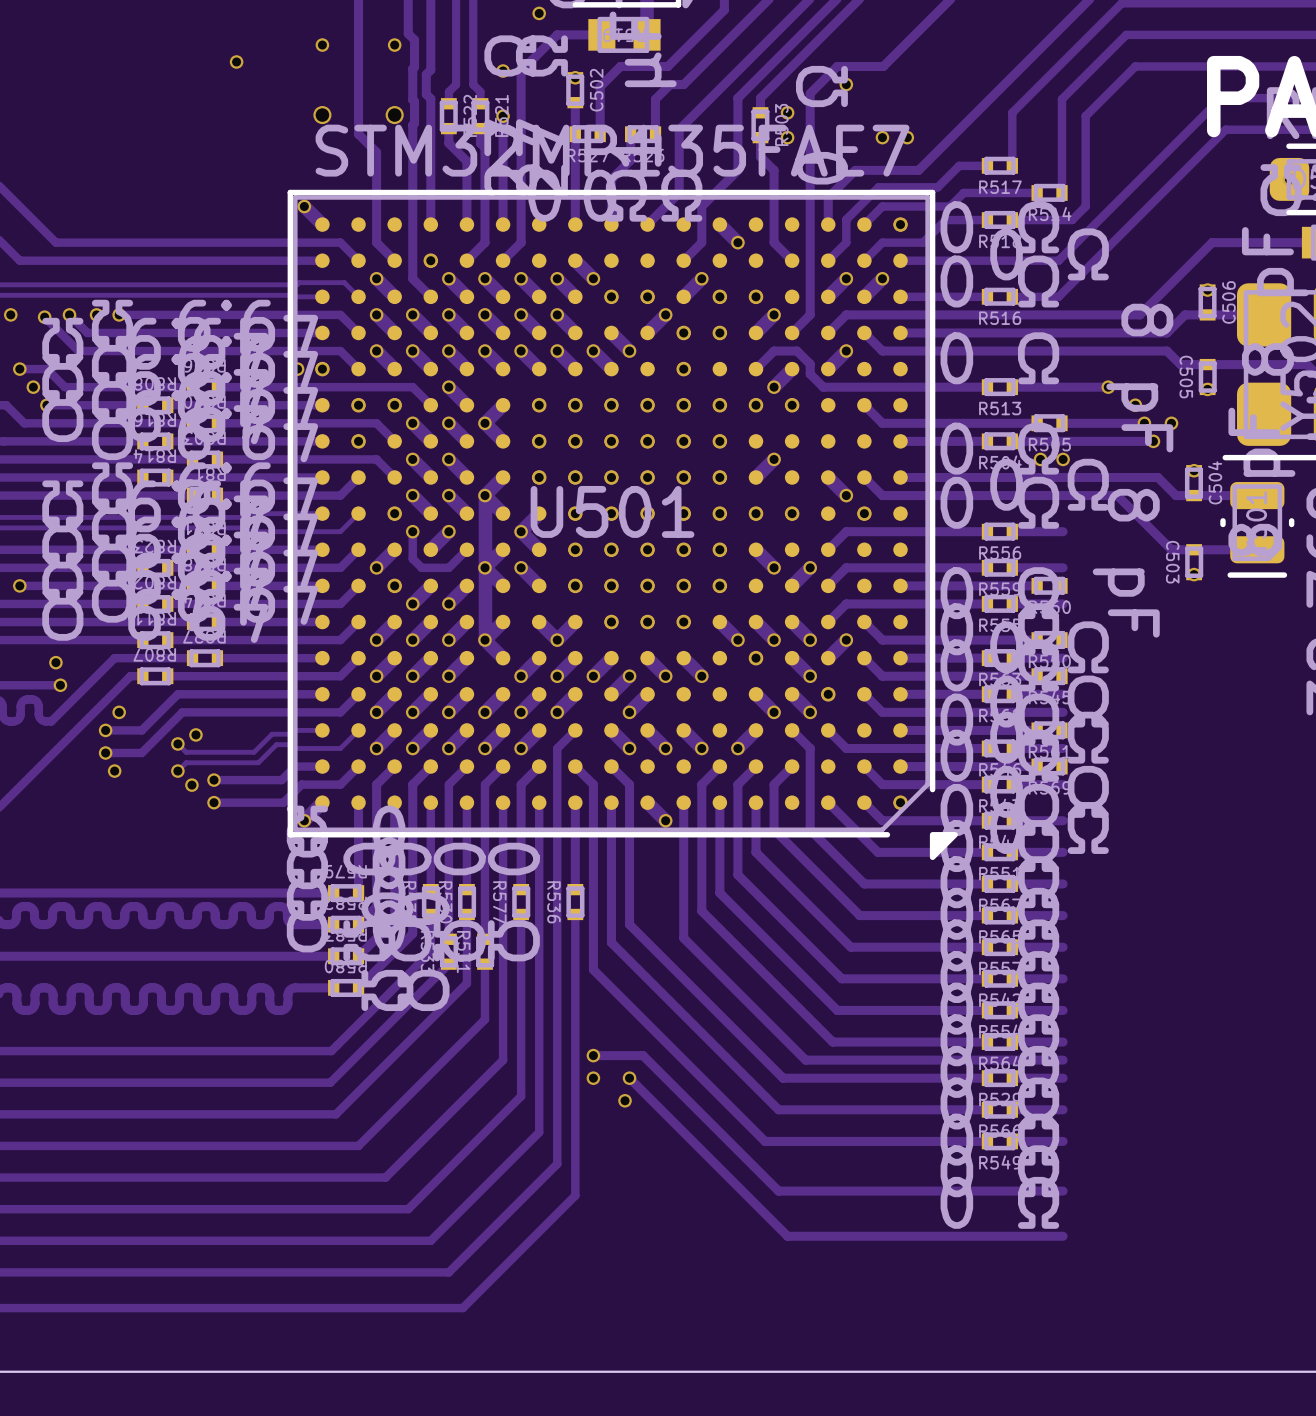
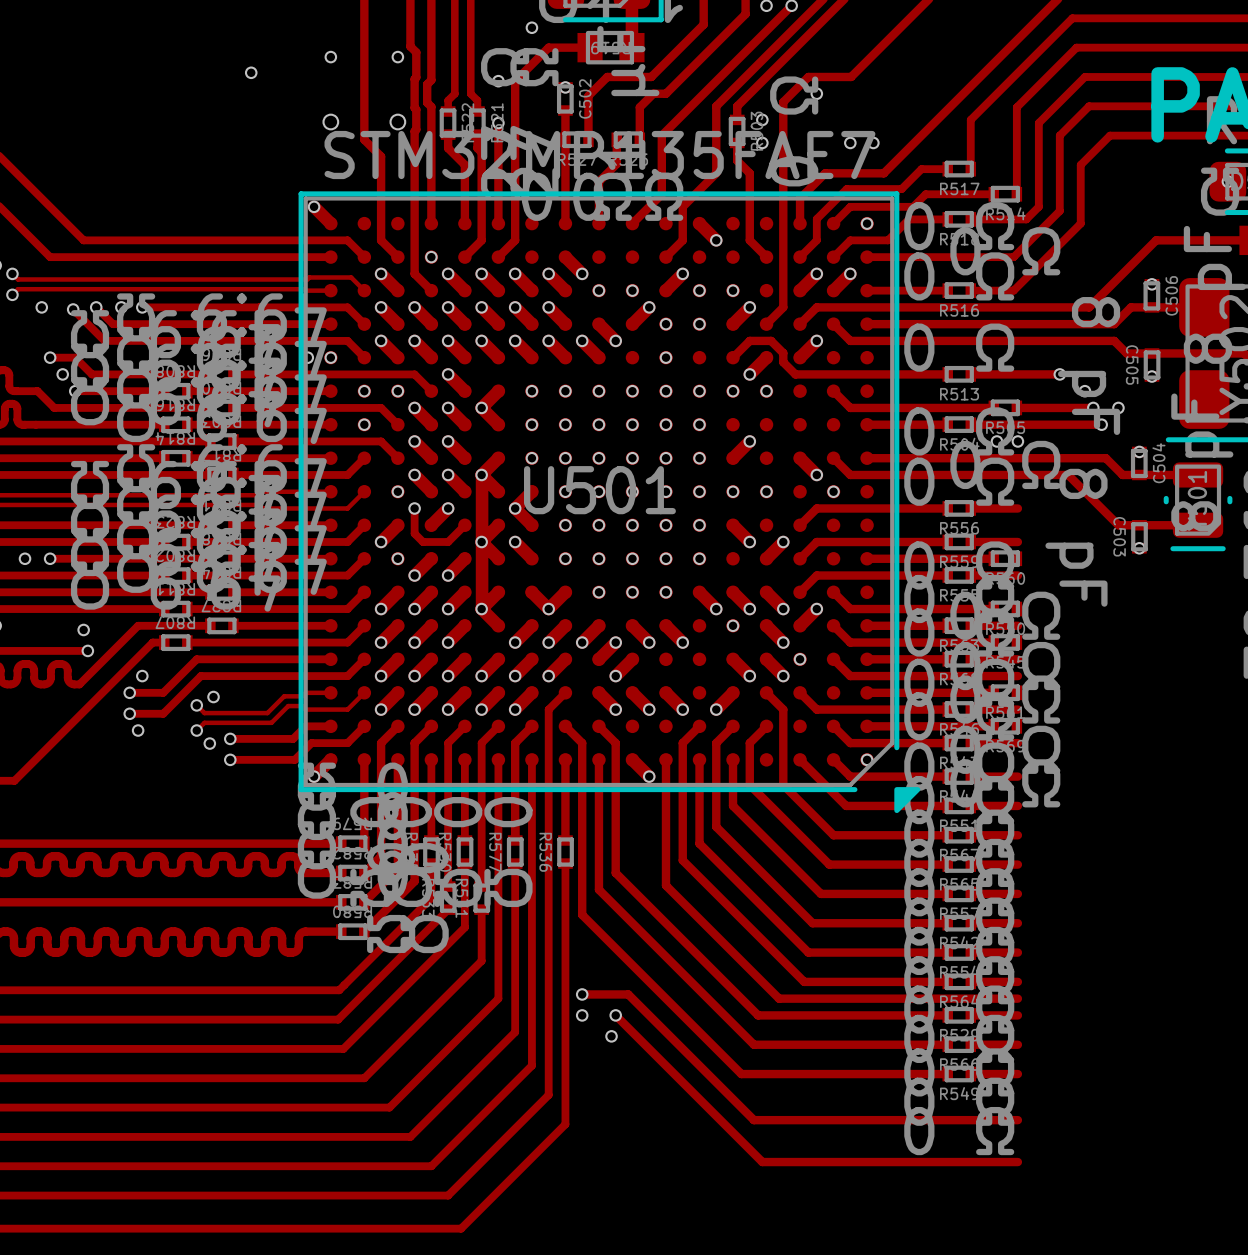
track: (1221, 98) (1108, 211) -> (1164, 106) (1089, 106) (1059, 135) (1059, 211)
track: (1225, 129) (1130, 224) -> (1168, 135) (1110, 135) (1080, 164) (1080, 223)

